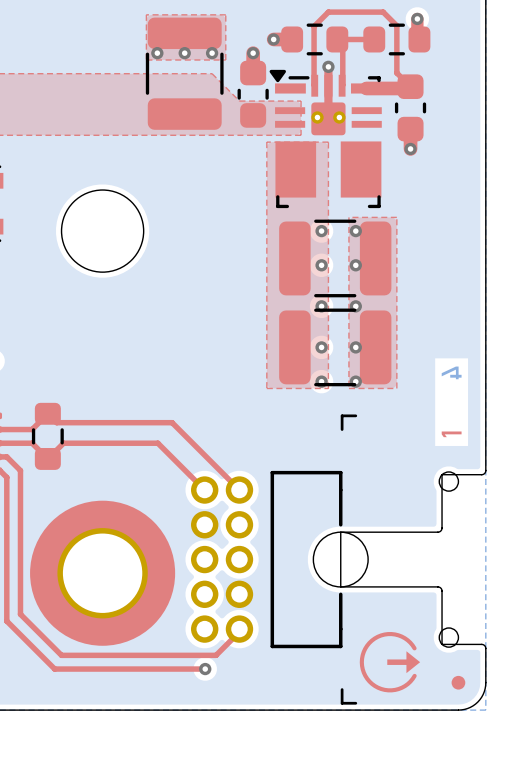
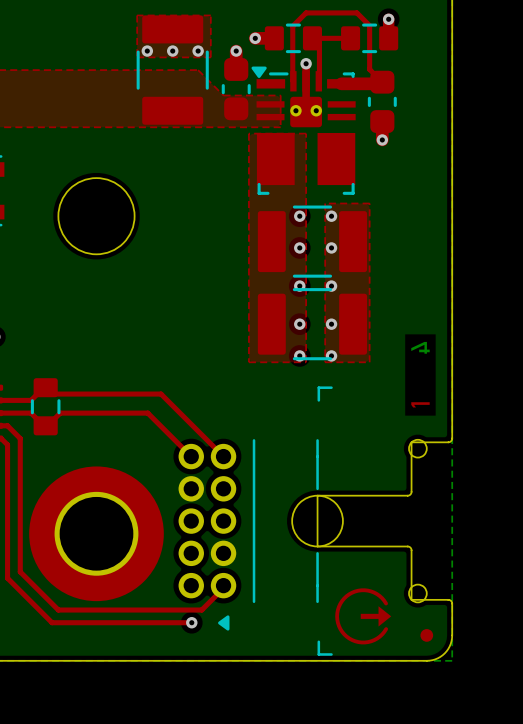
part footprint: [145, 17, 224, 130] -> [136, 15, 209, 125]
part footprint: [281, 23, 349, 56] -> [264, 23, 322, 54]
part footprint: [363, 23, 431, 56] -> [341, 23, 399, 54]
part footprint: [279, 219, 392, 298] -> [257, 205, 368, 278]
part footprint: [279, 308, 392, 387] -> [257, 288, 368, 361]
part footprint: [31, 402, 64, 470] -> [30, 378, 61, 436]
part footprint: [191, 470, 343, 649] -> [178, 439, 319, 631]

